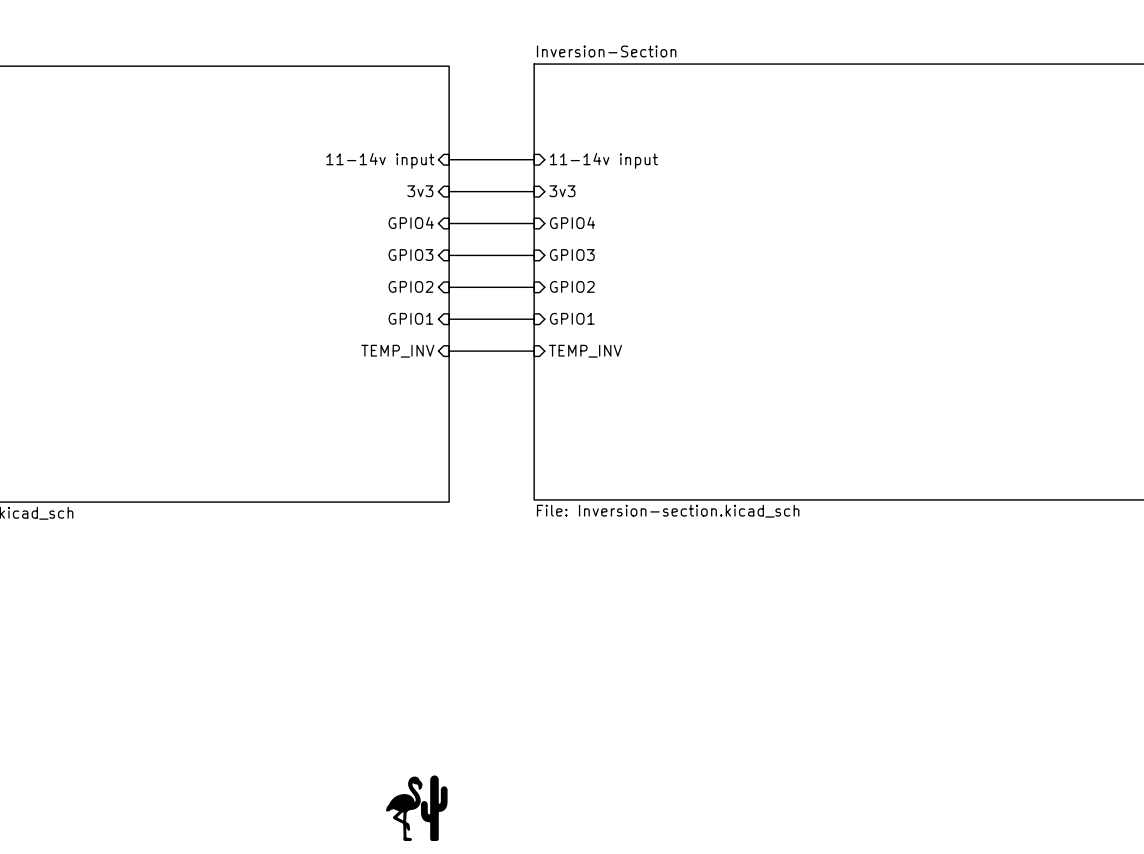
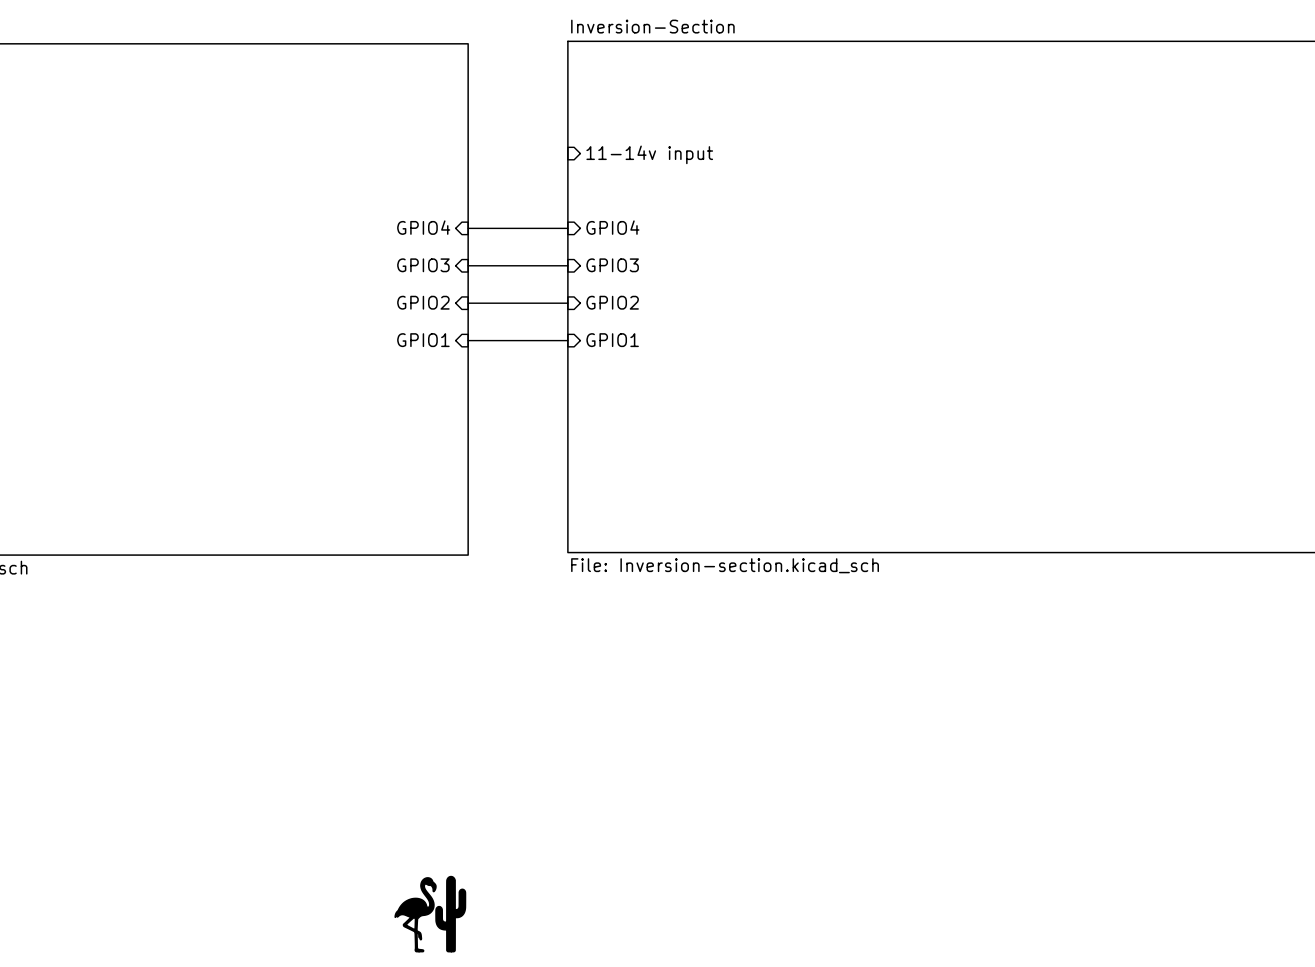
wire: (449, 159) (534, 159) -> none
sheet pin: 11-14v input (380, 160) -> none
sheet pin: 3v3 (420, 191) -> none
wire: (449, 191) (534, 191) -> none
sheet pin: 3v3 (562, 191) -> none
sheet pin: TEMP_INV (397, 351) -> none
wire: (449, 351) (534, 351) -> none
sheet pin: TEMP_INV (585, 351) -> none

